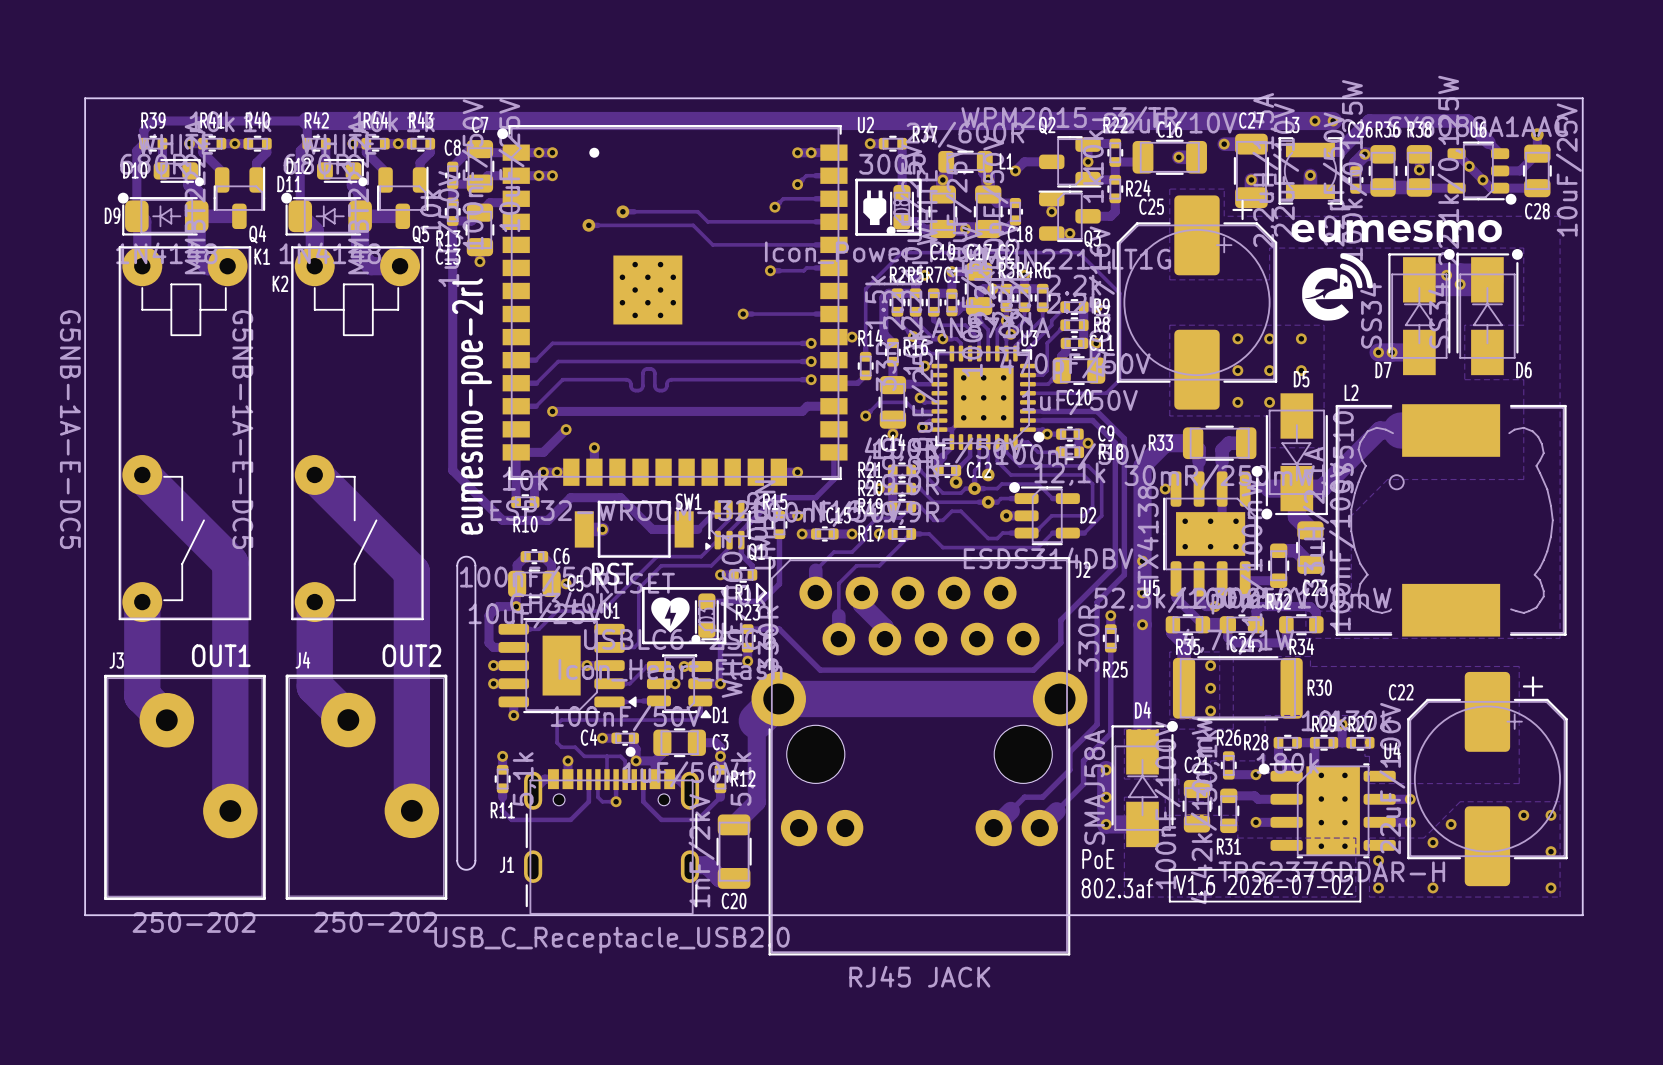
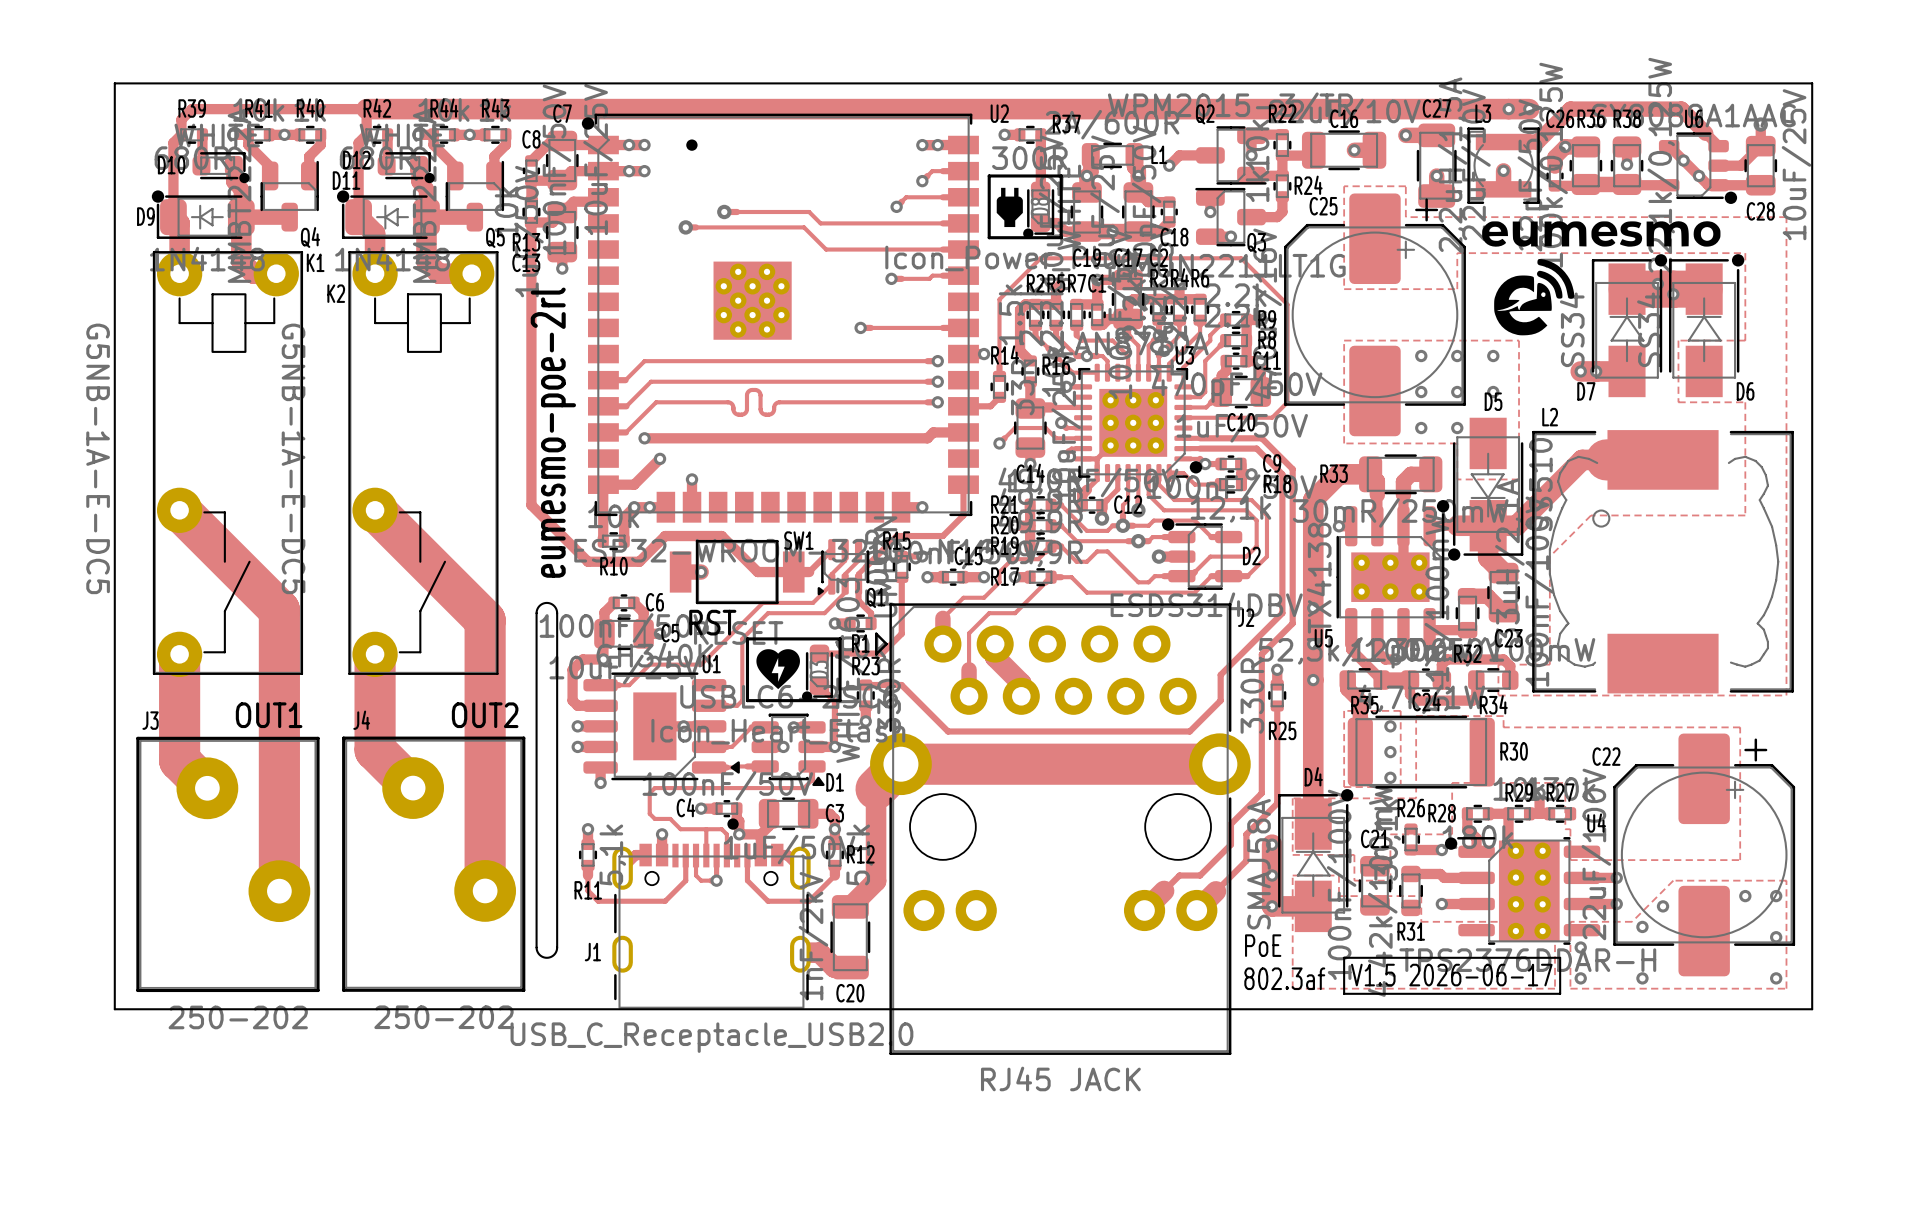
text: V1.6 2026-07-02 (1264, 885) -> V1.5 2026-06-17 (1451, 975)

